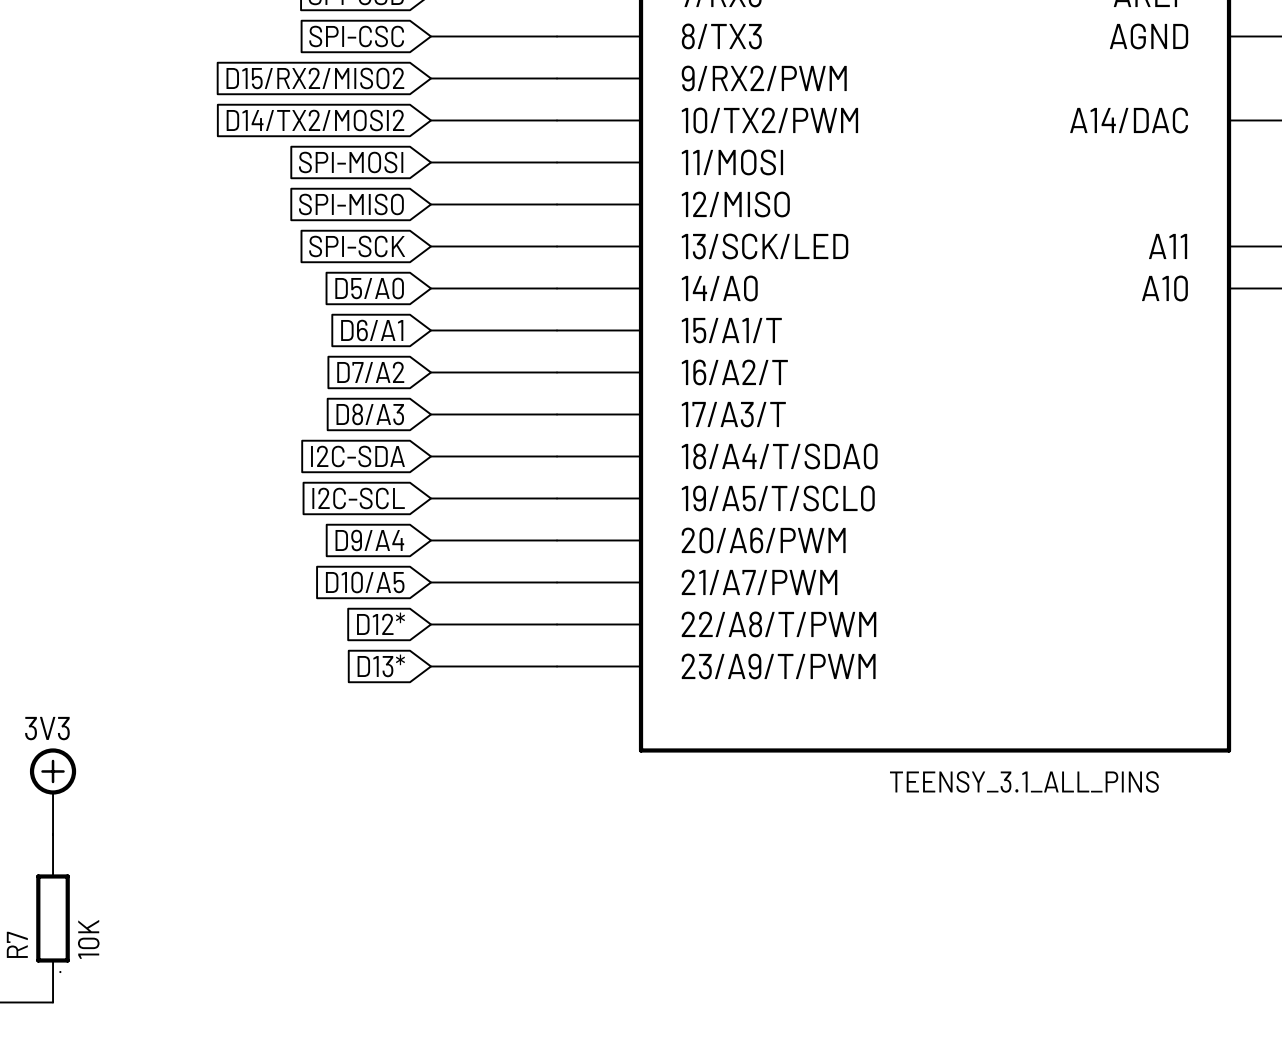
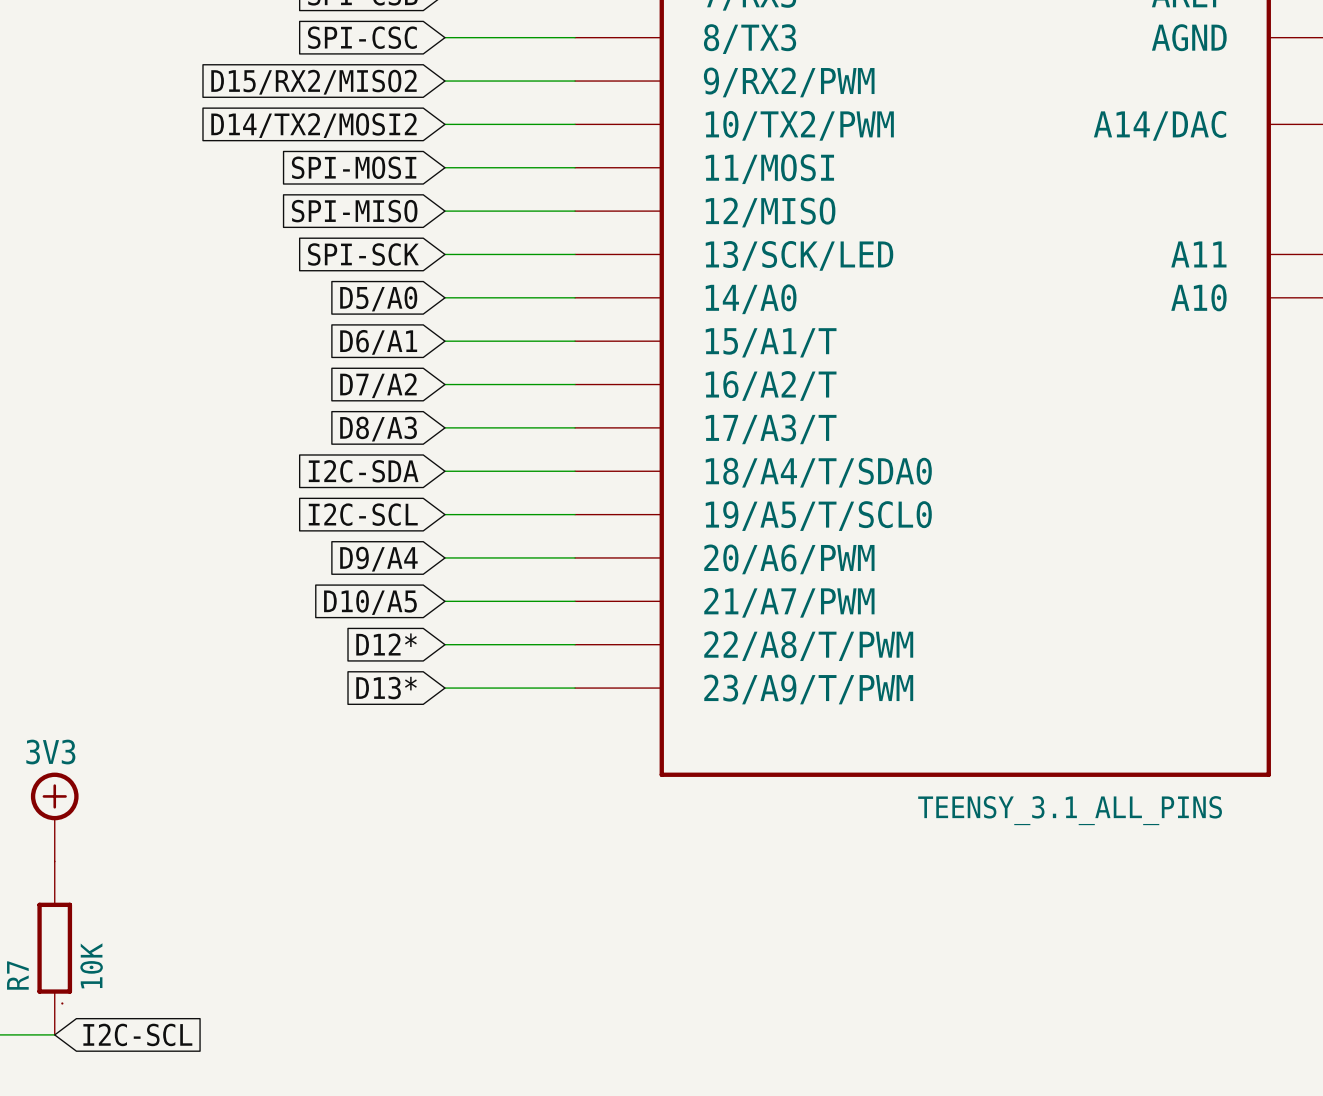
global label: none -> I2C-SCL (137, 1034)

